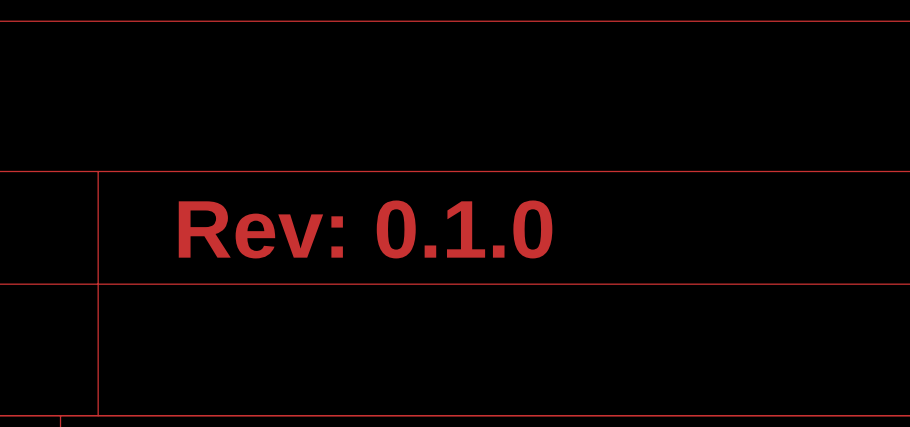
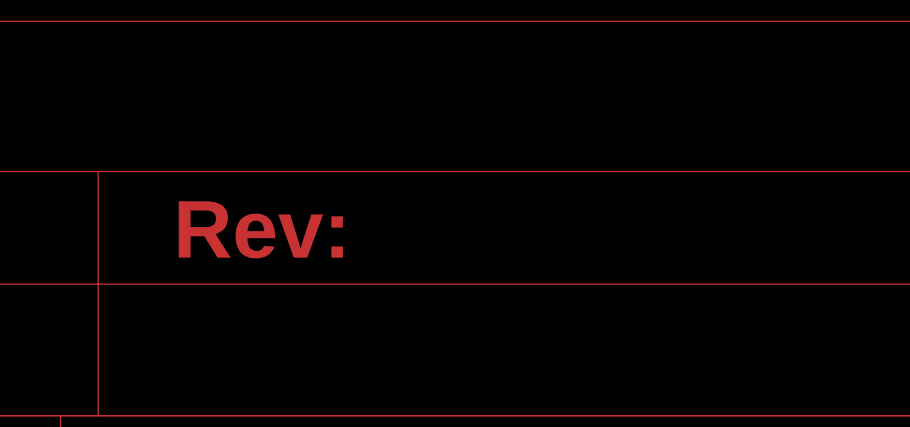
title block: Rev: 0.1.0 (365, 229) -> Rev: (260, 229)

